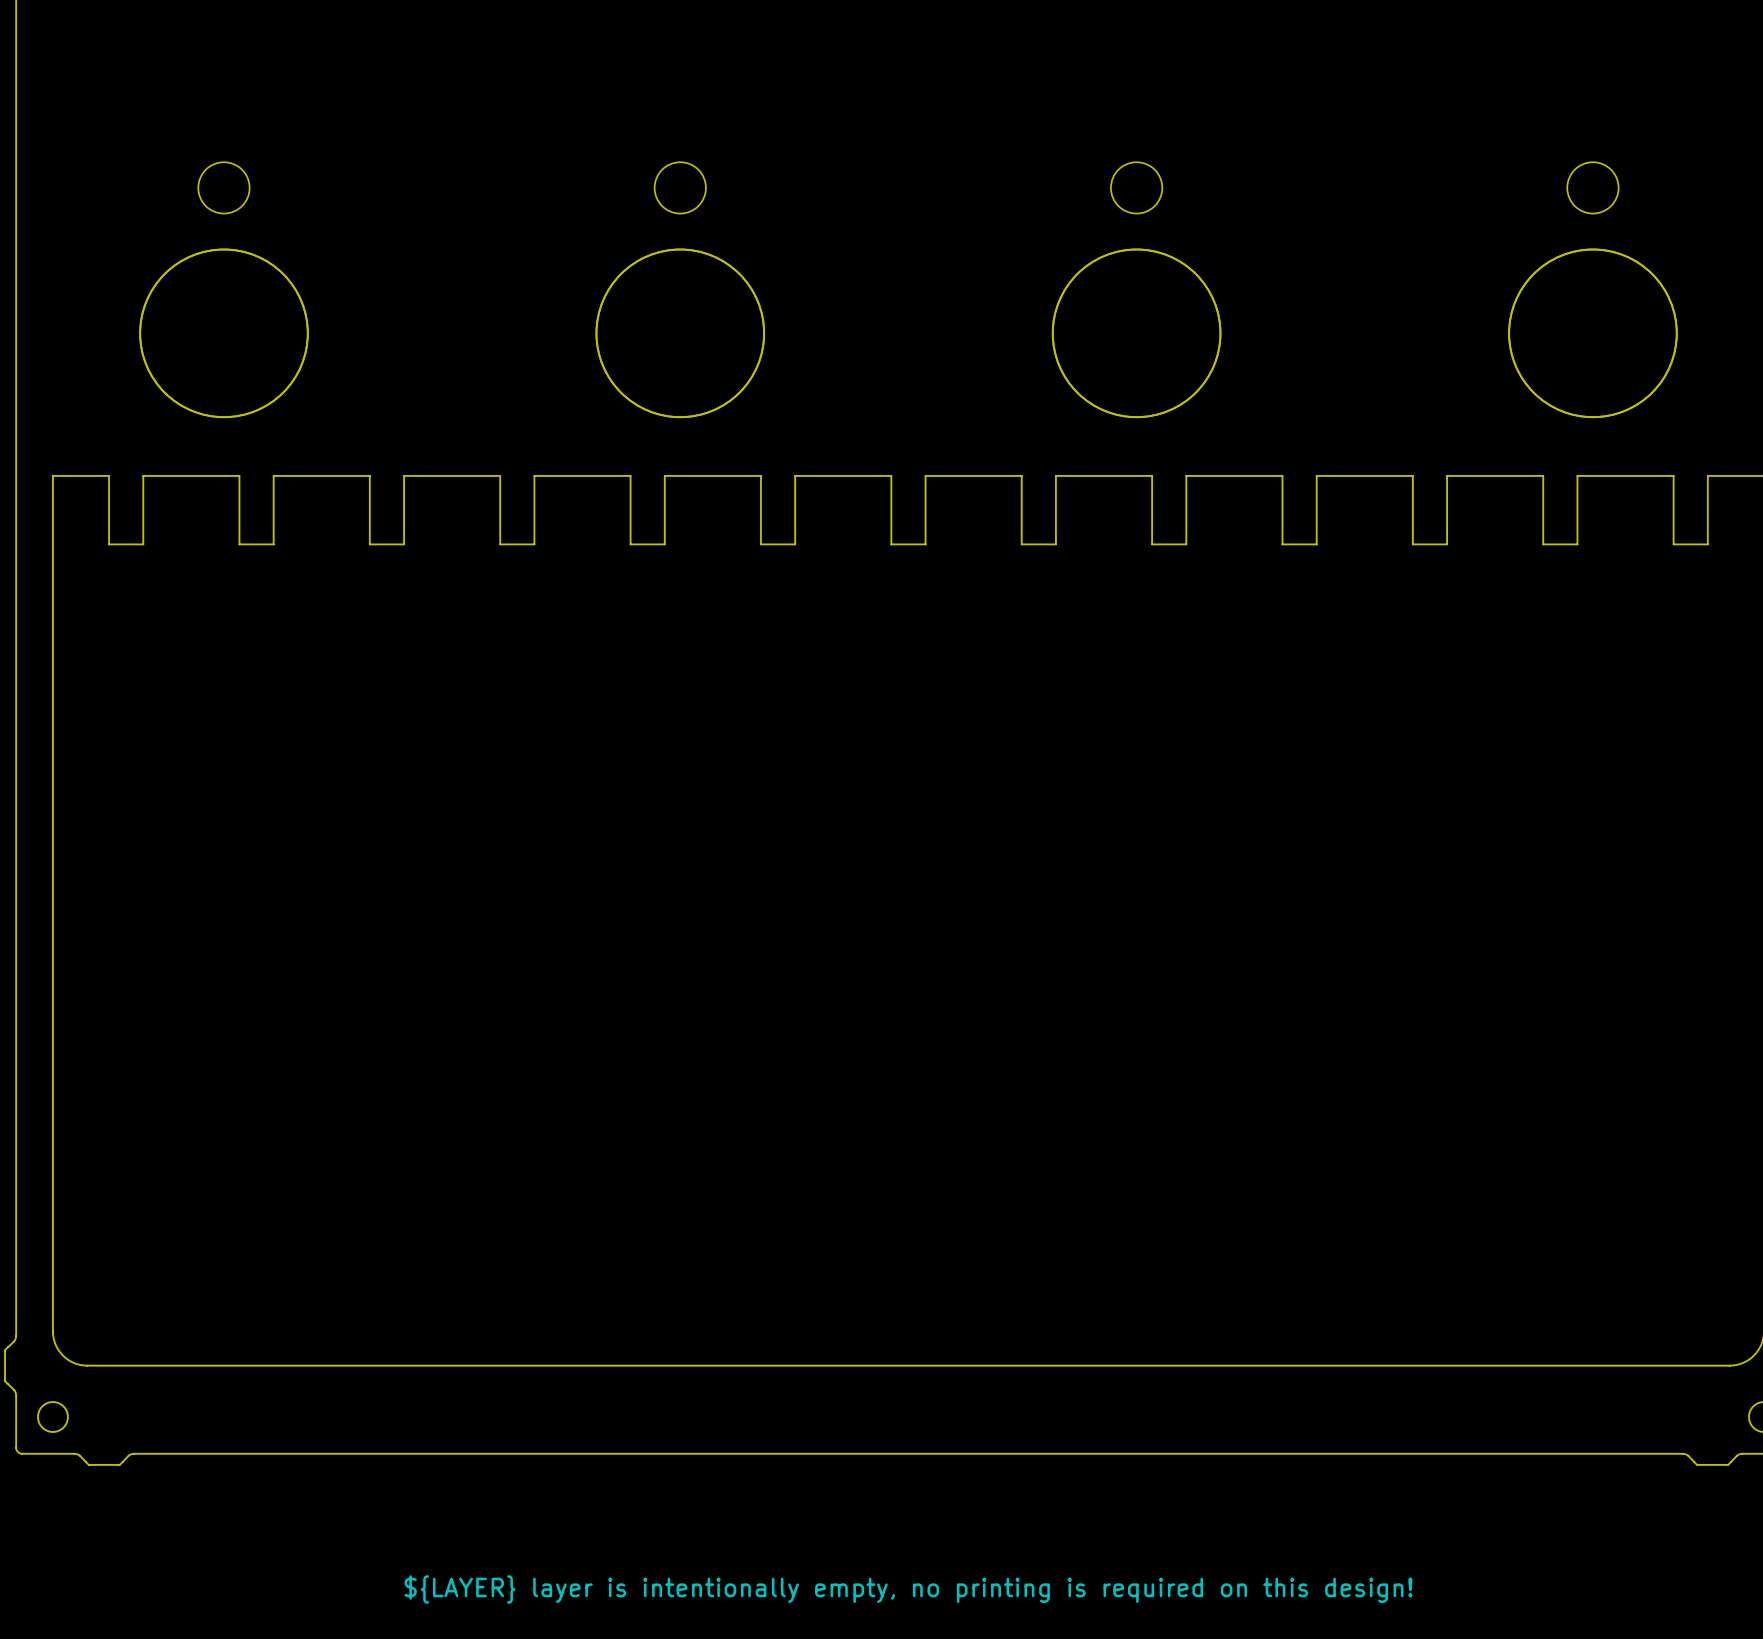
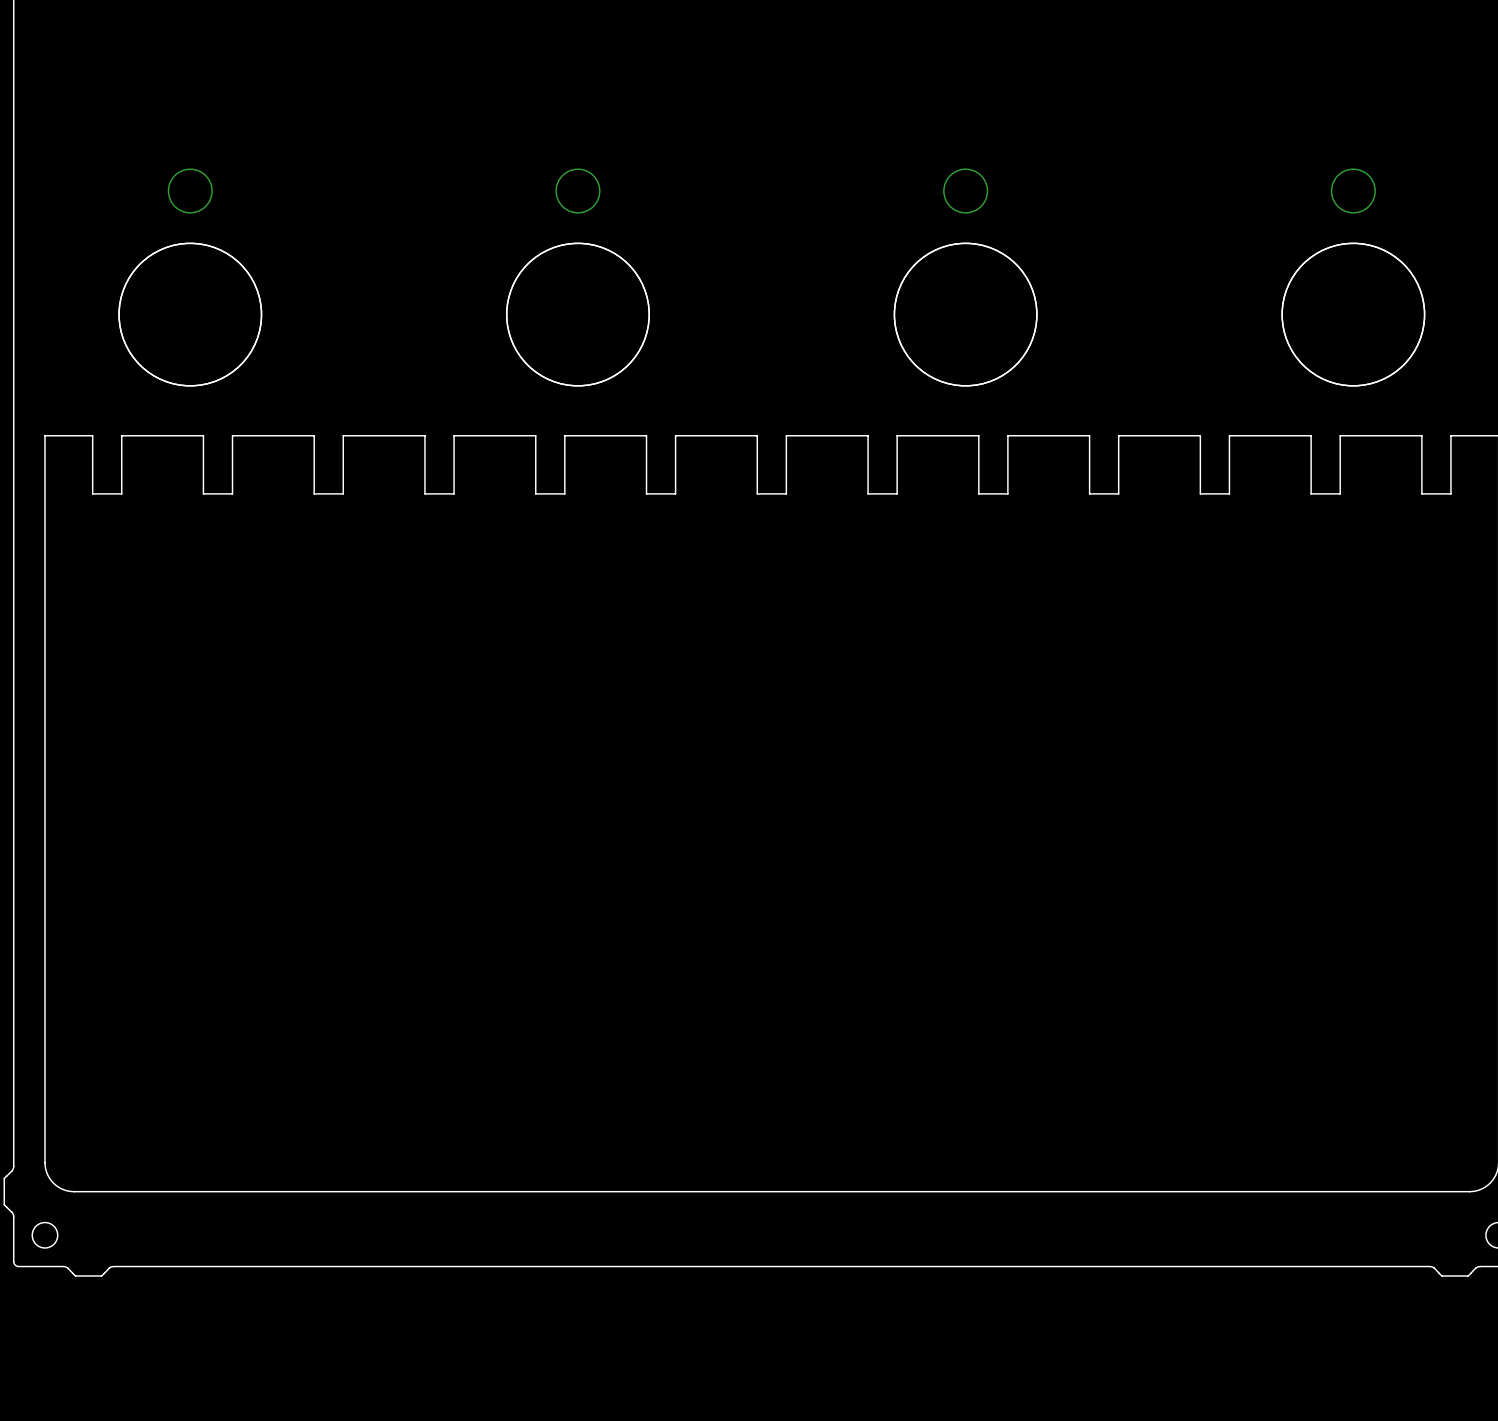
text: ${LAYER} layer is intentionally empty, no printing is required on this design! (908, 1589) -> none

